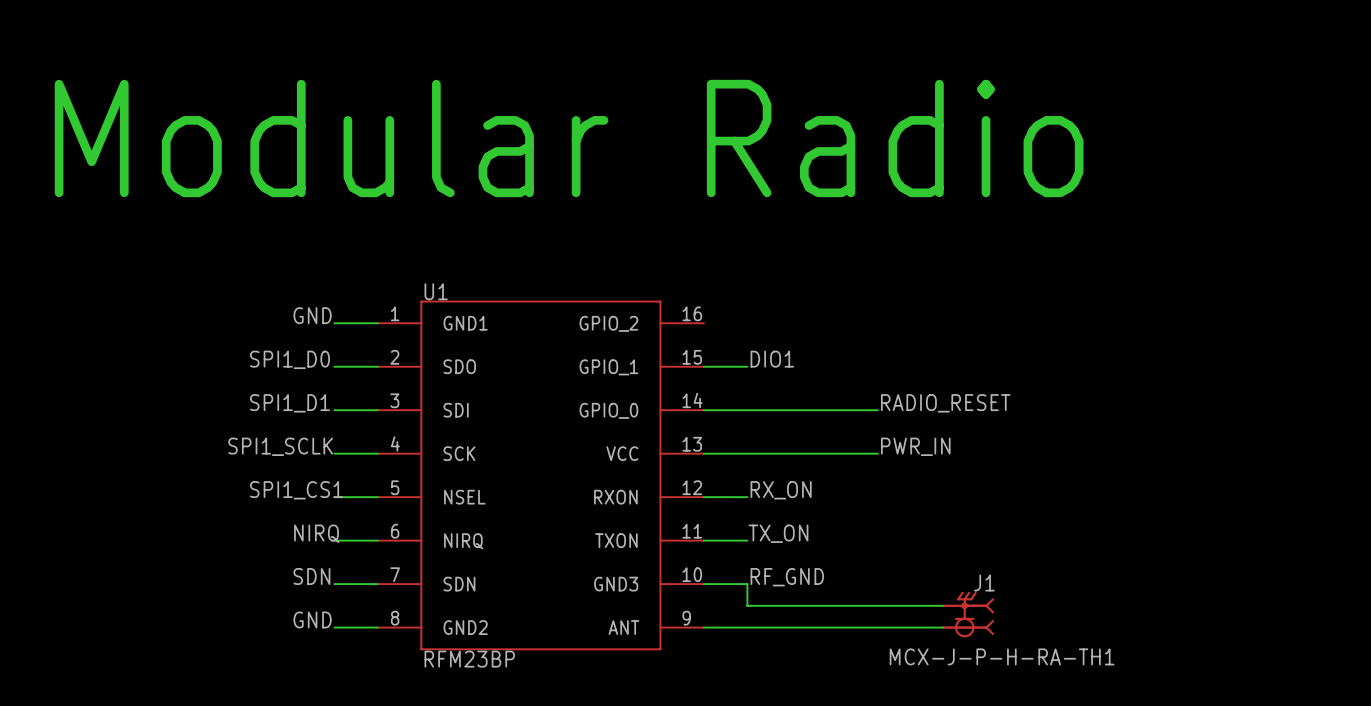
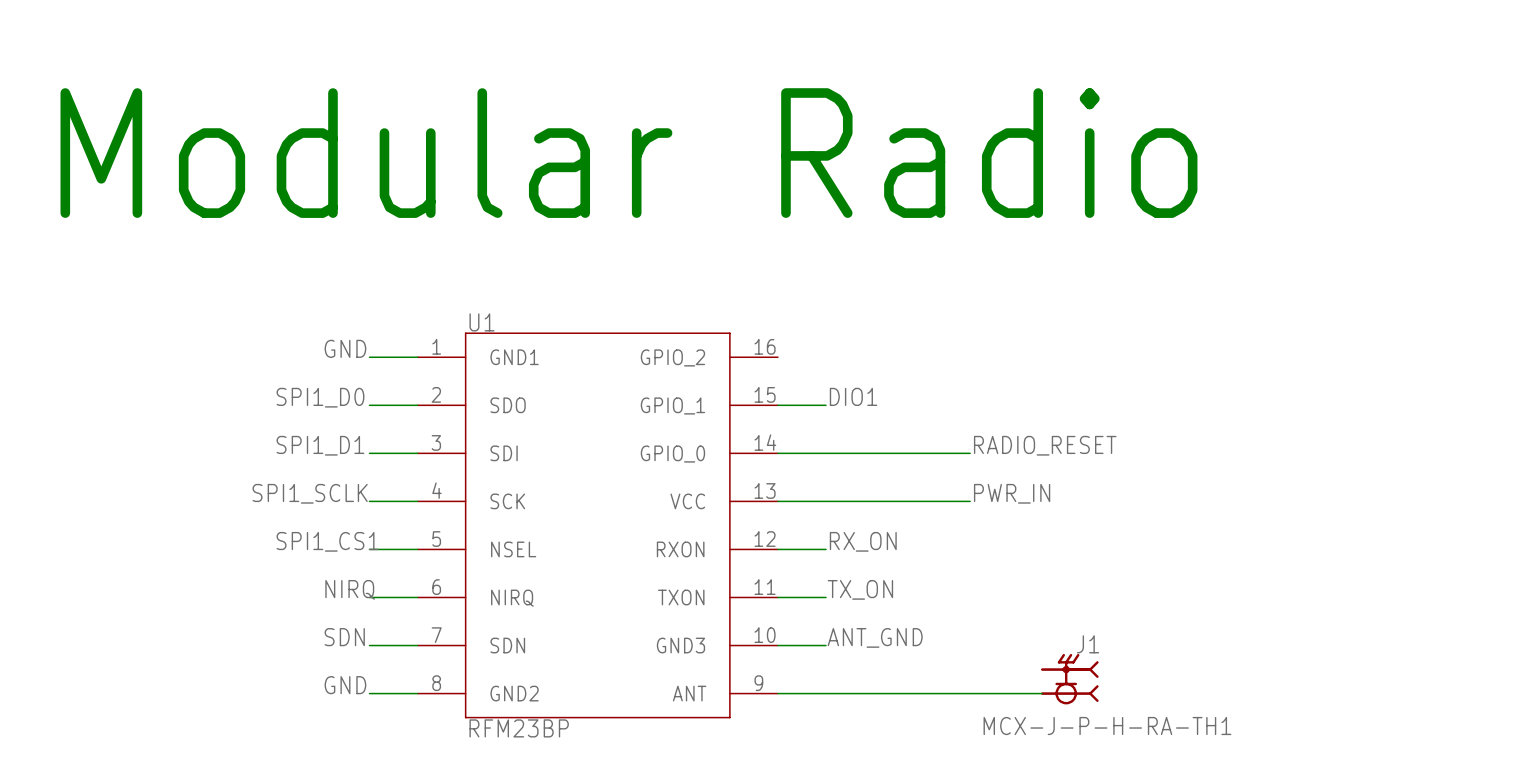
label: RF_GND (787, 577) -> ANT_GND (875, 637)
wire: (747, 584) (747, 605) (943, 605) -> none

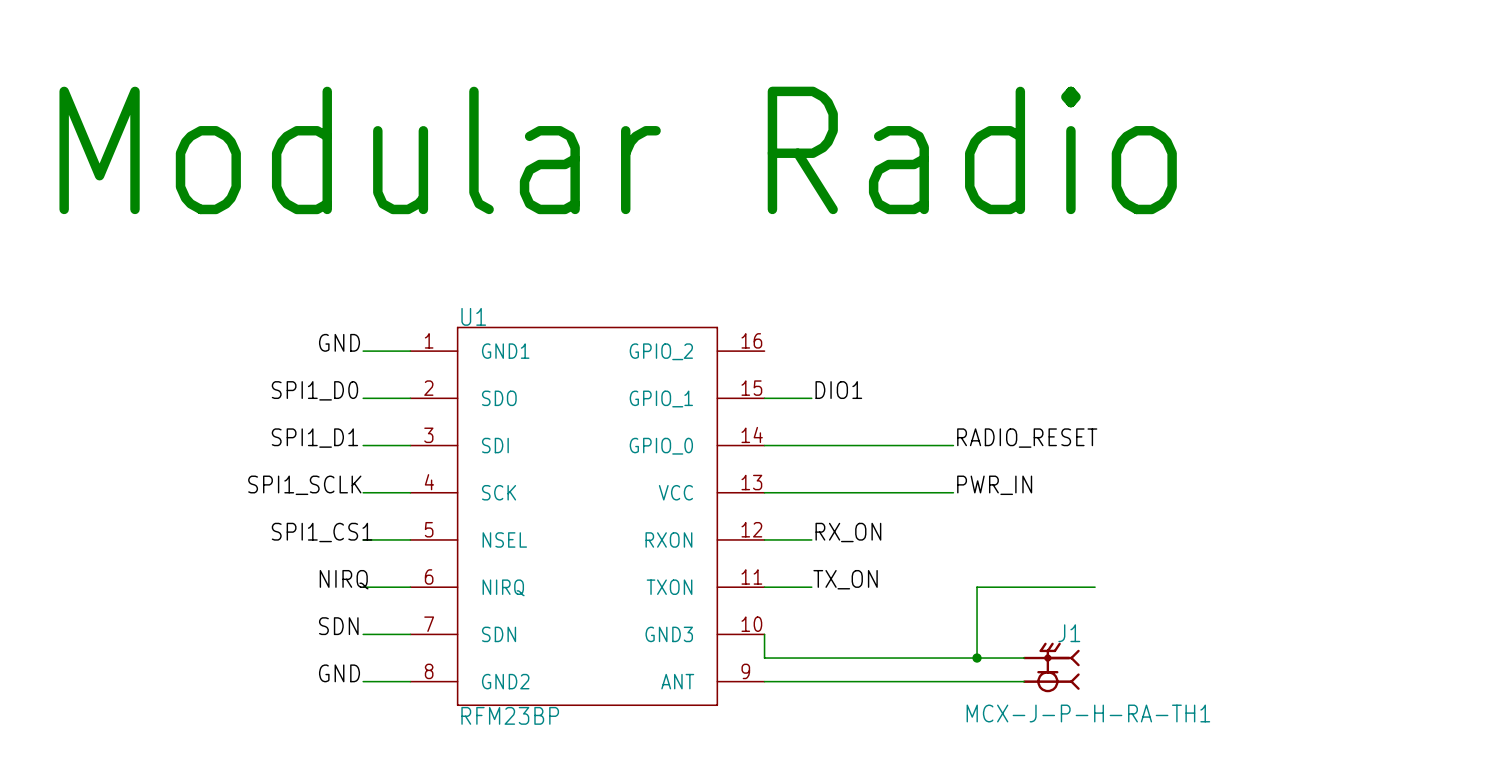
wire: none -> (1095, 587) (977, 587) (977, 658)
label: ANT_GND (875, 637) -> none
wire: (777, 645) (825, 645) -> (764, 634) (764, 658) (1024, 658)
junction: none -> (977, 658)

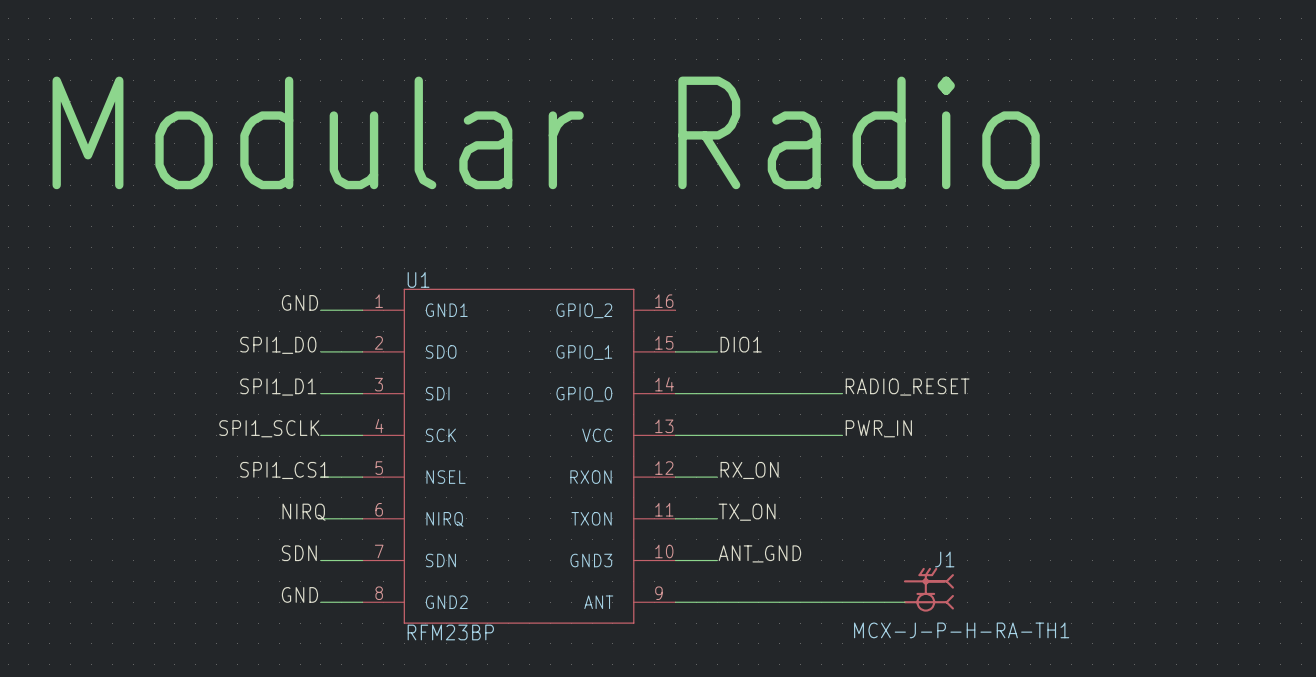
wire: (1095, 587) (977, 587) (977, 658) -> none
label: none -> ANT_GND (759, 553)
wire: (764, 634) (764, 658) (1024, 658) -> (675, 560) (717, 560)
junction: (977, 658) -> none

